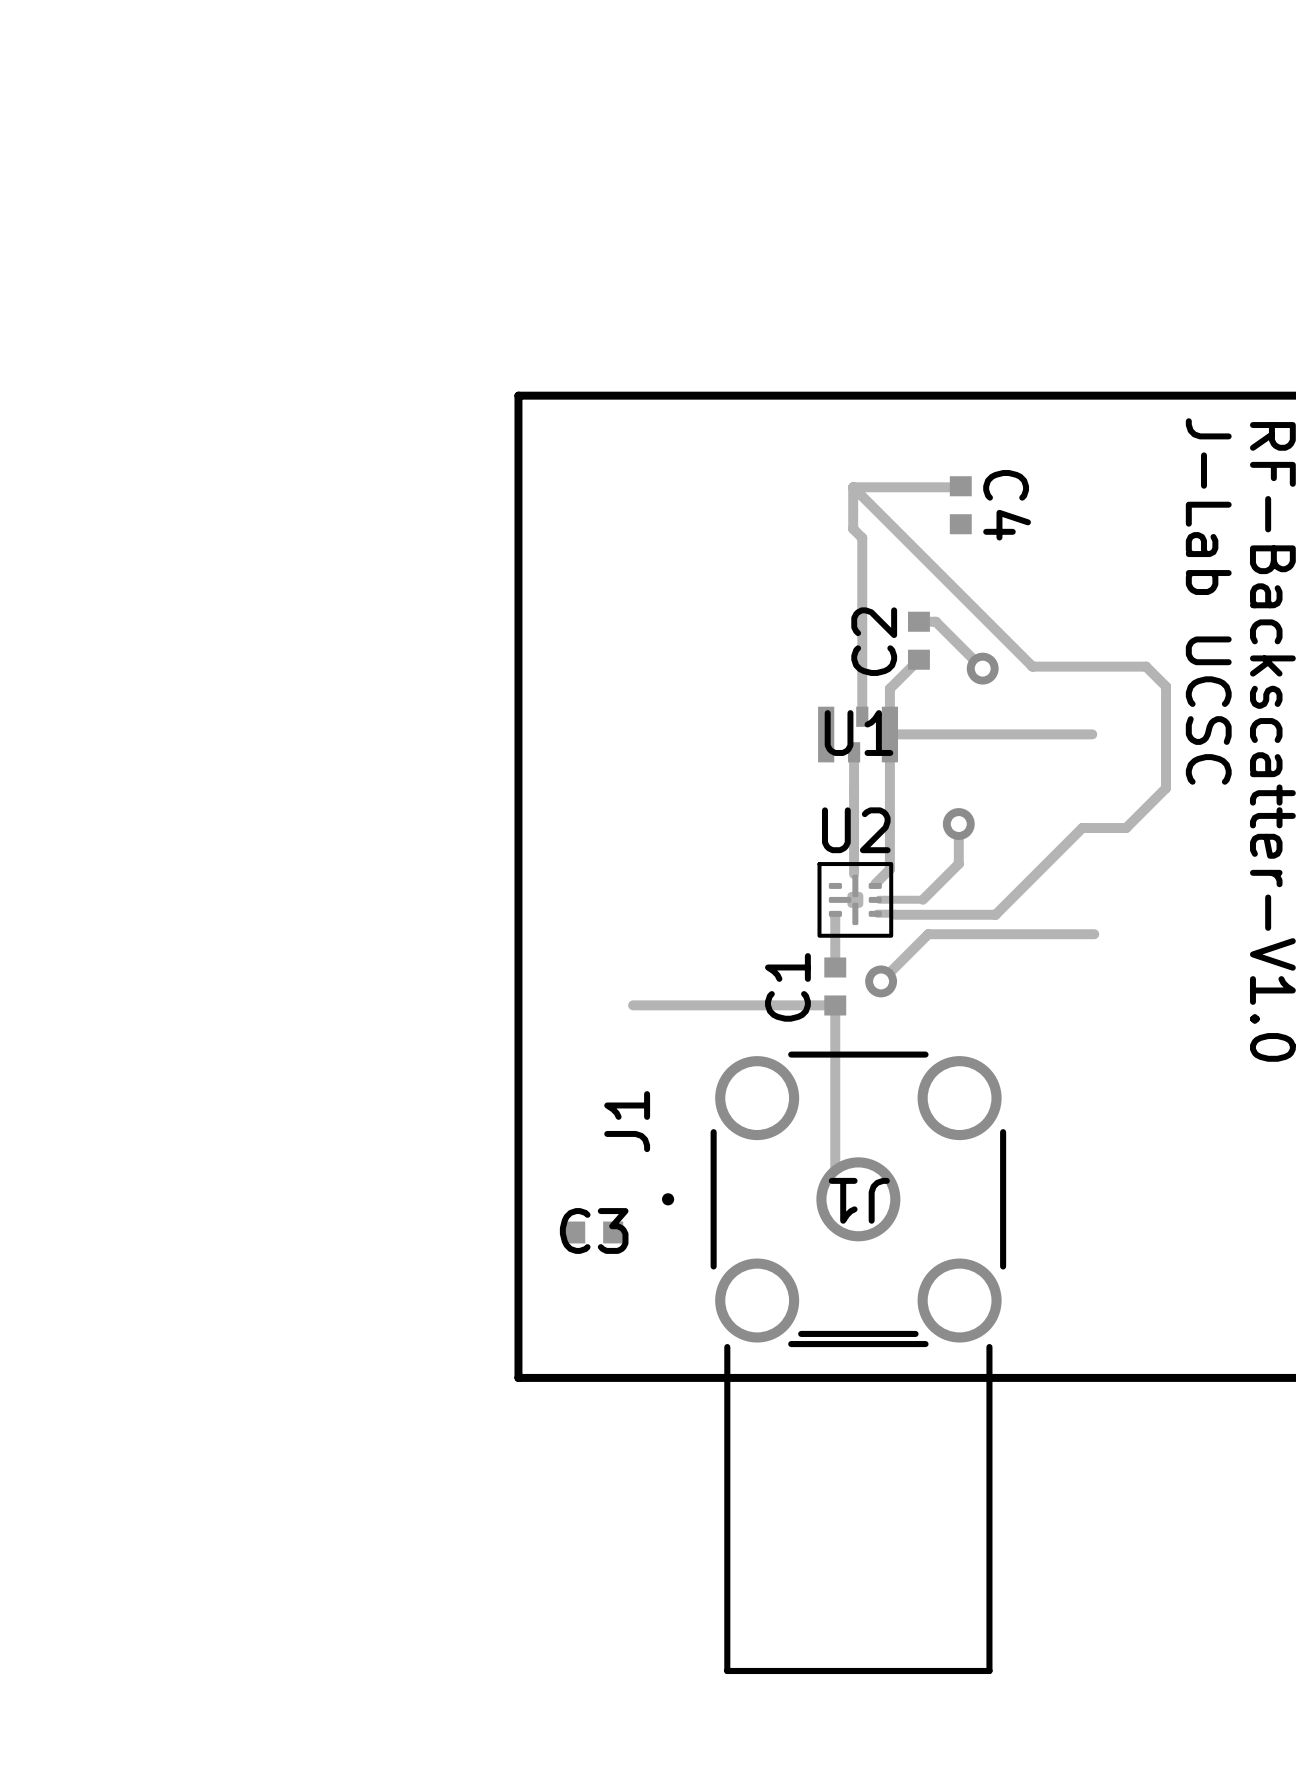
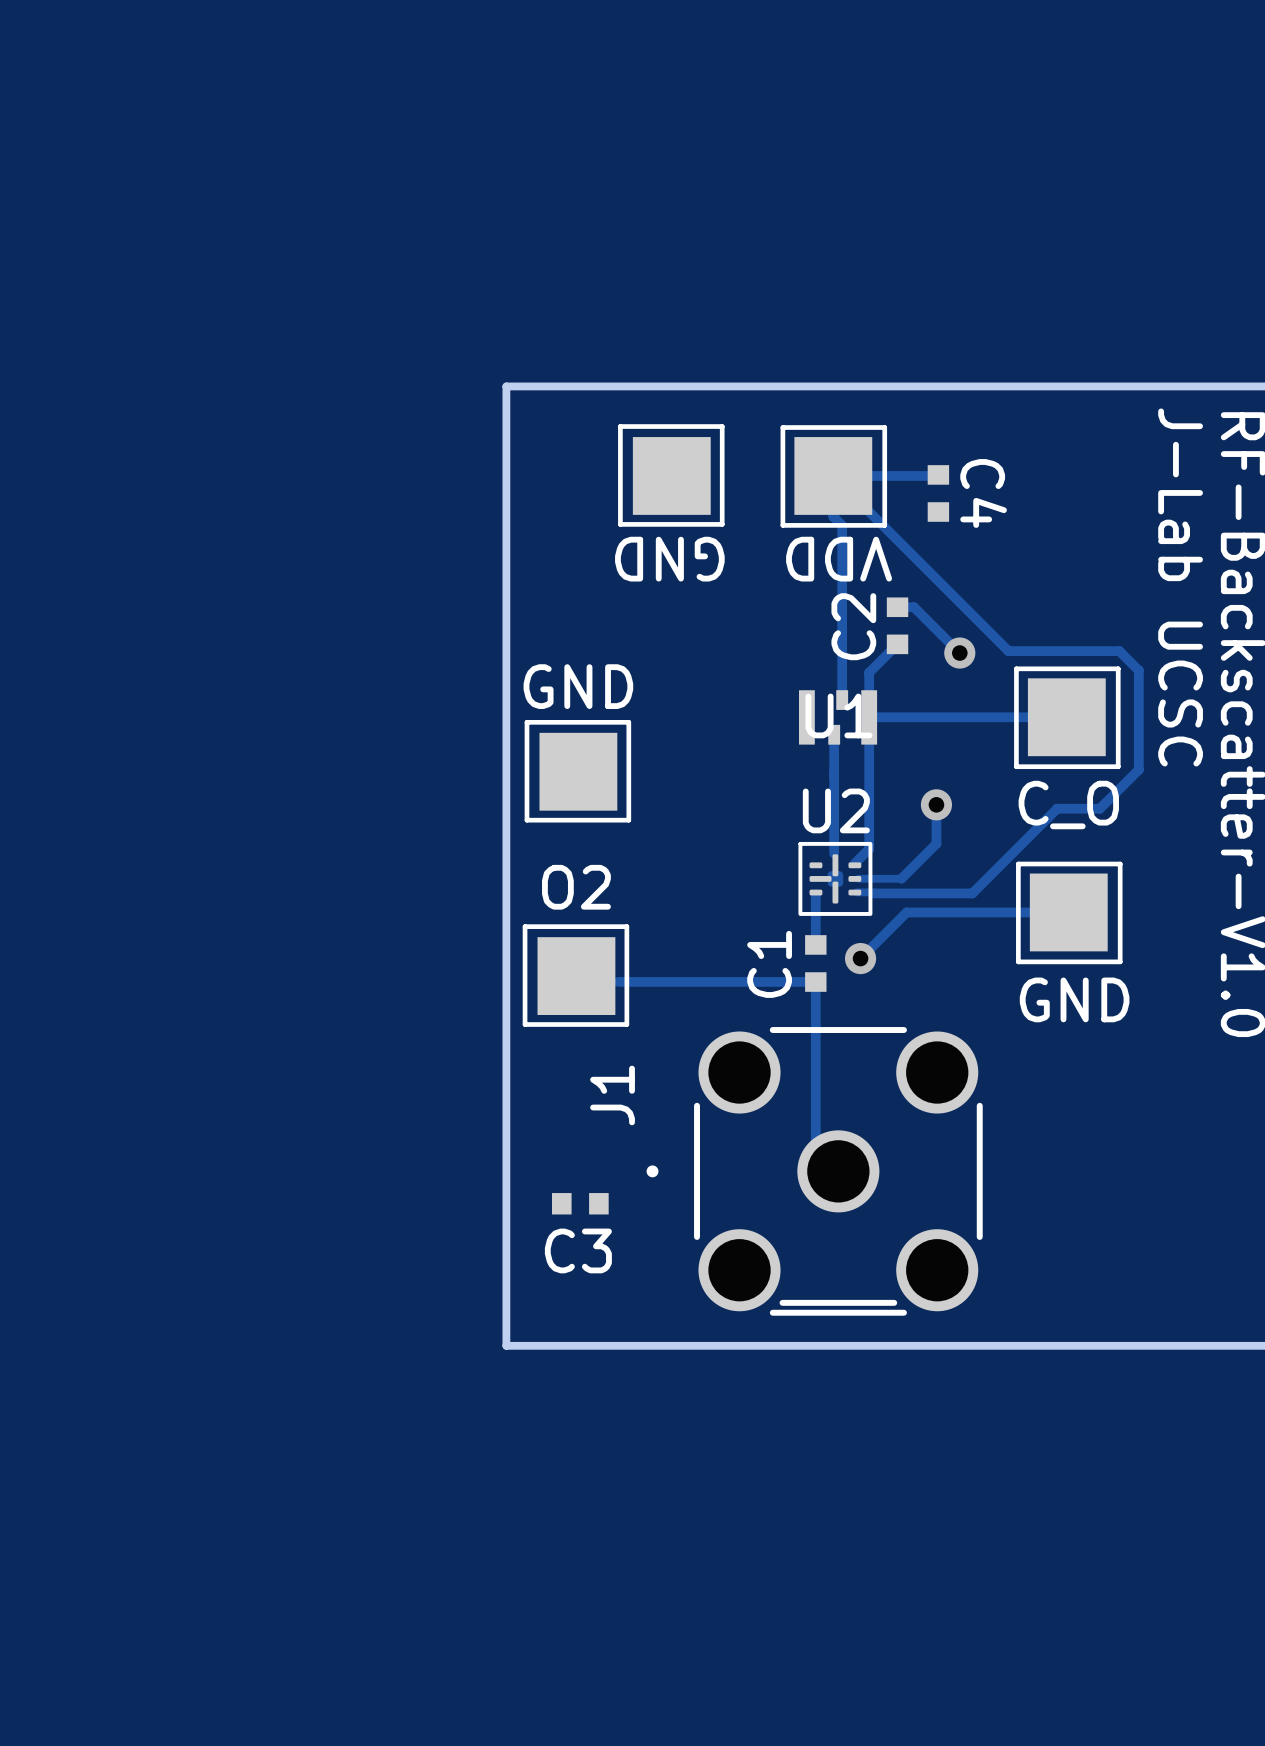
GND: none -> (671, 475)
VDD: none -> (833, 476)
C_O: none -> (1067, 717)
GND: none -> (577, 771)
GND: none -> (1069, 912)
O2: none -> (575, 975)
part: none -> (814, 1171)
C3 name position: C3 (594, 1230) -> C3 (578, 1250)
J1: (834, 1362) -> none

